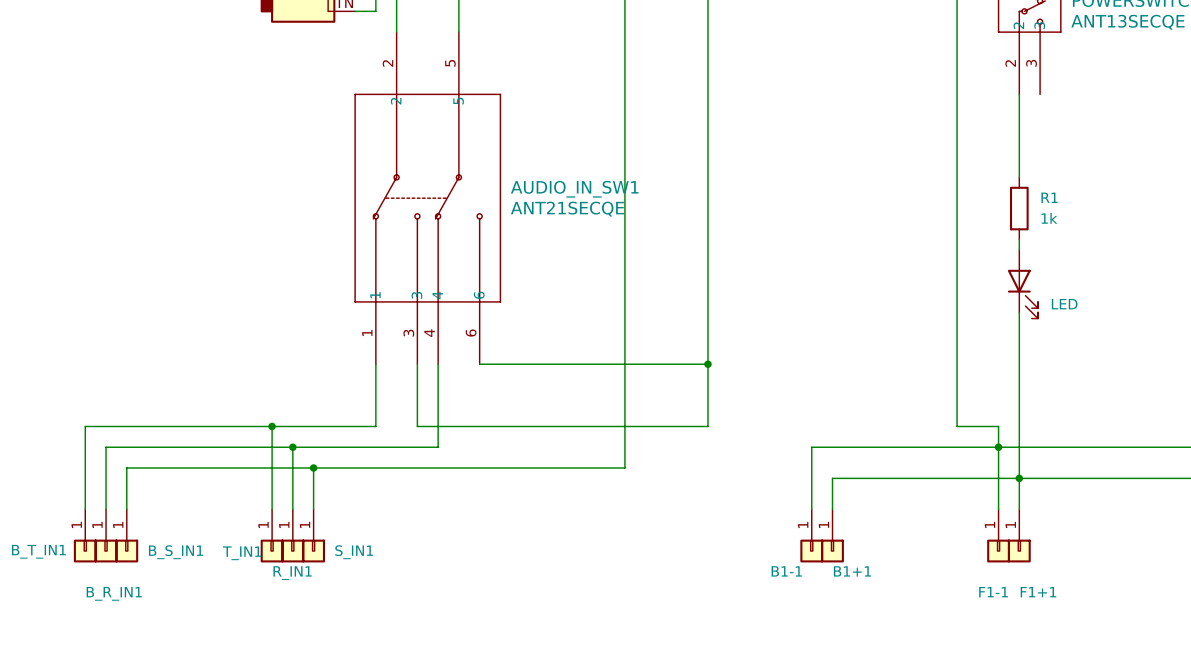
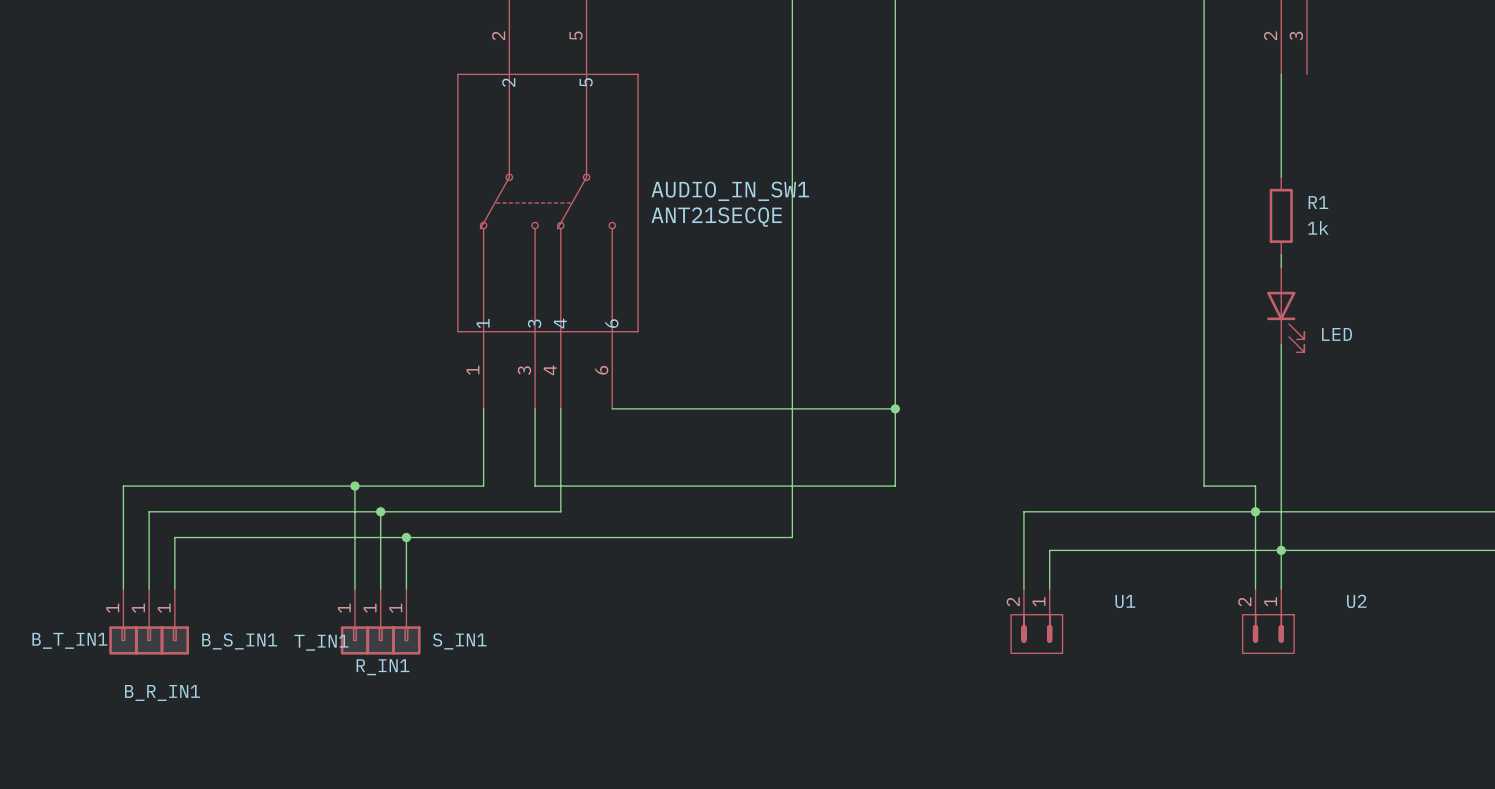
U1: none -> (1056, 601)
U2: none -> (1287, 601)
B1-1: (811, 535) -> none
B1+1: (832, 535) -> none
F1-1: (998, 535) -> none
F1+1: (1019, 535) -> none

